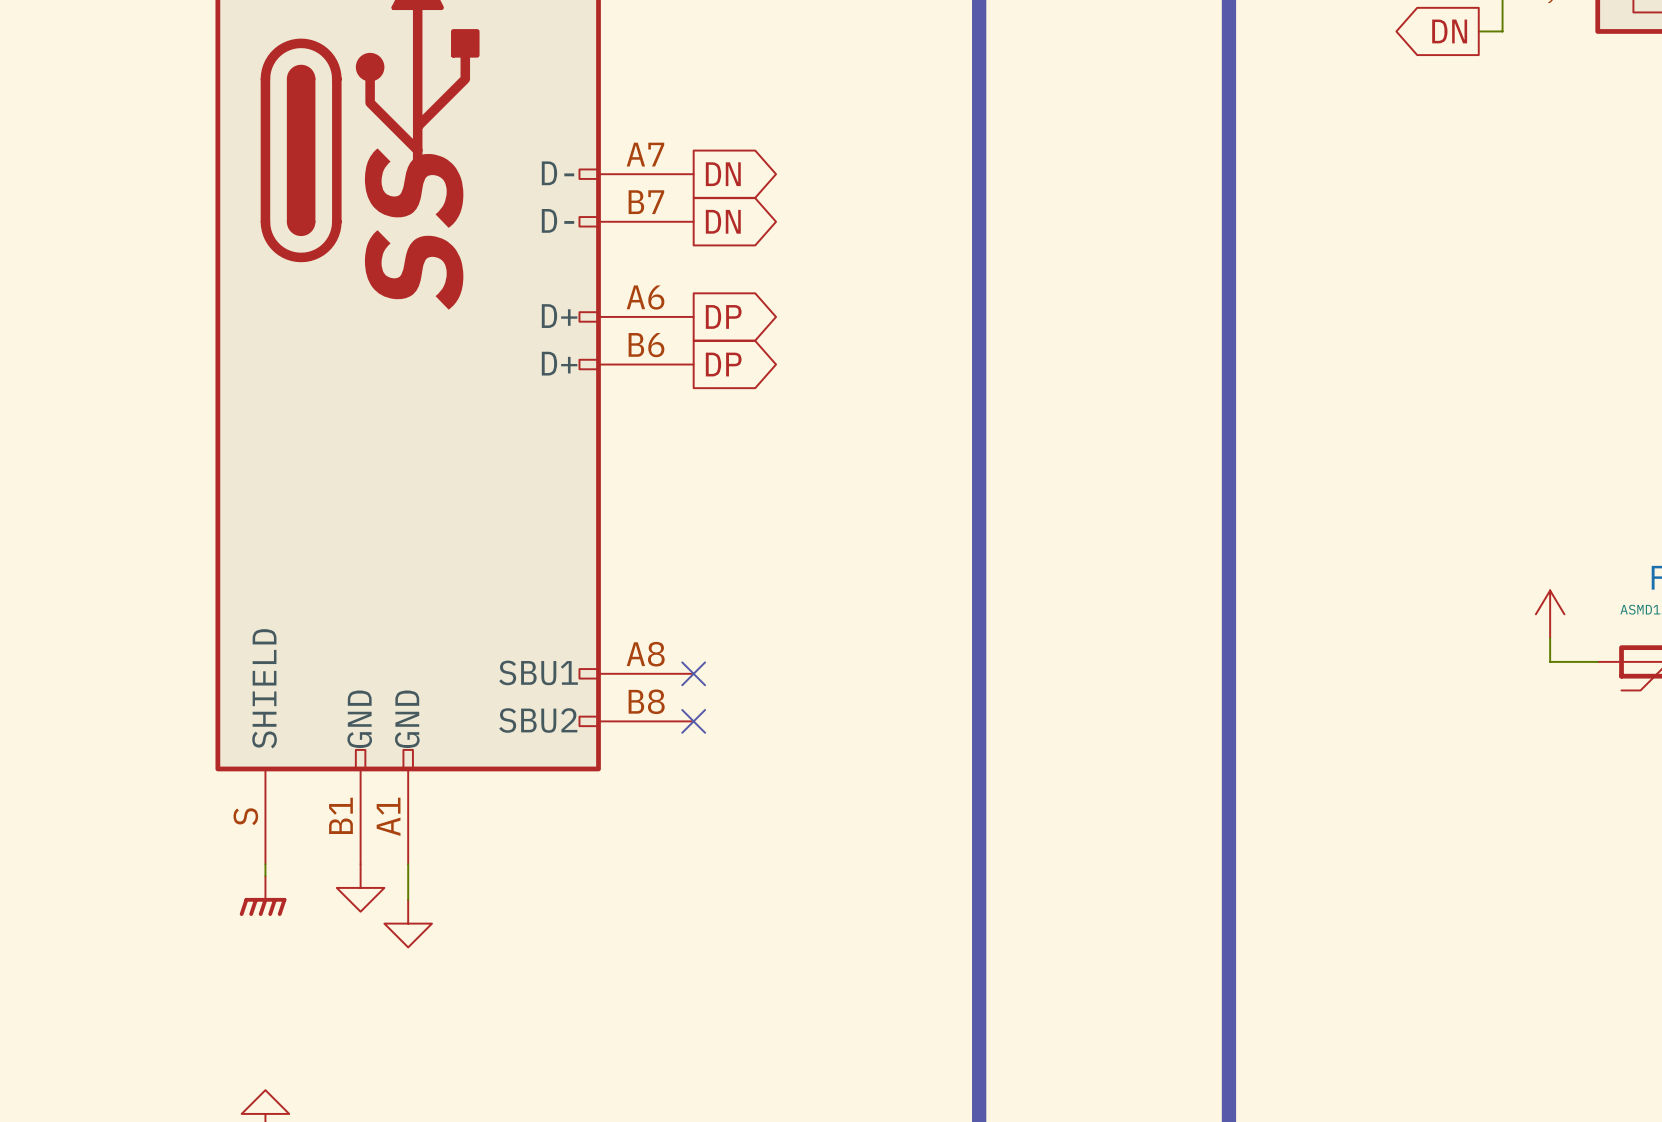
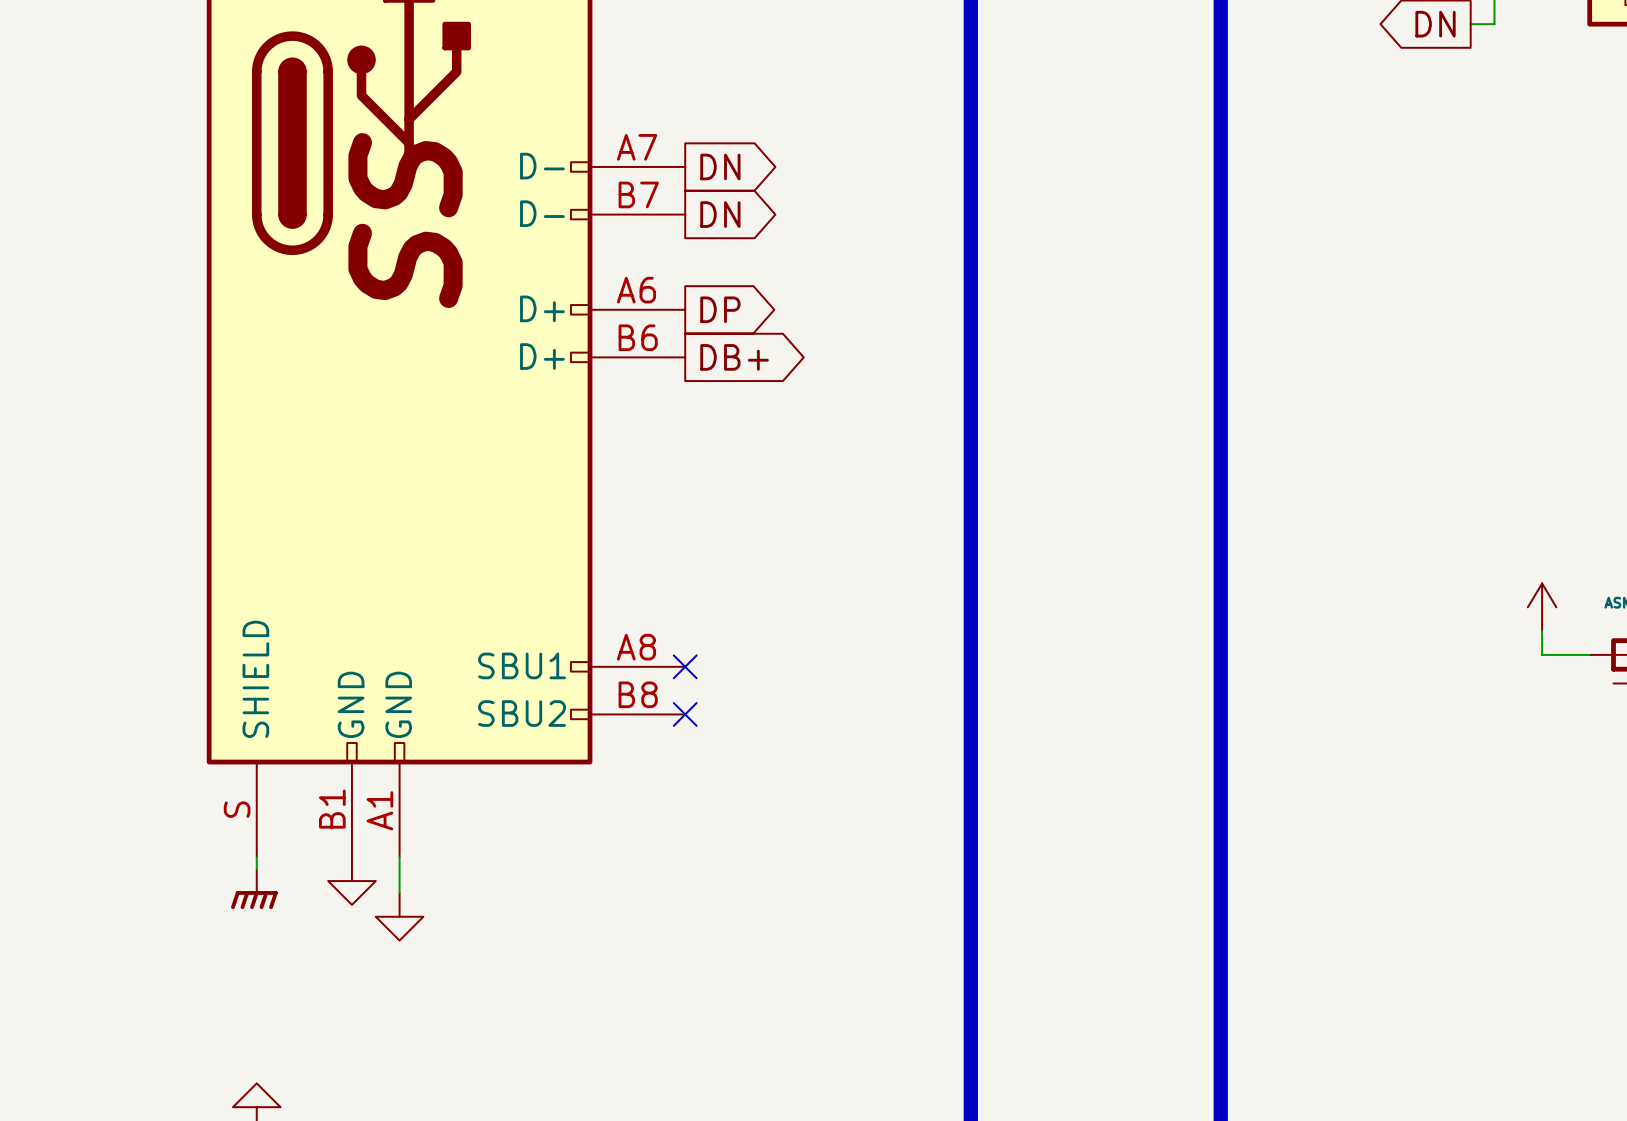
global label: DP (723, 364) -> DB+ (734, 357)

